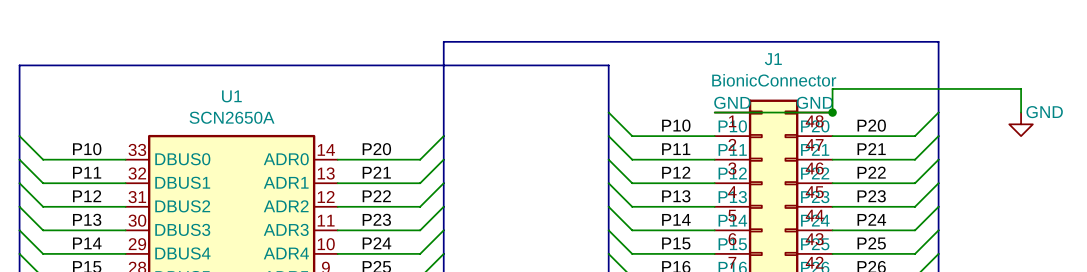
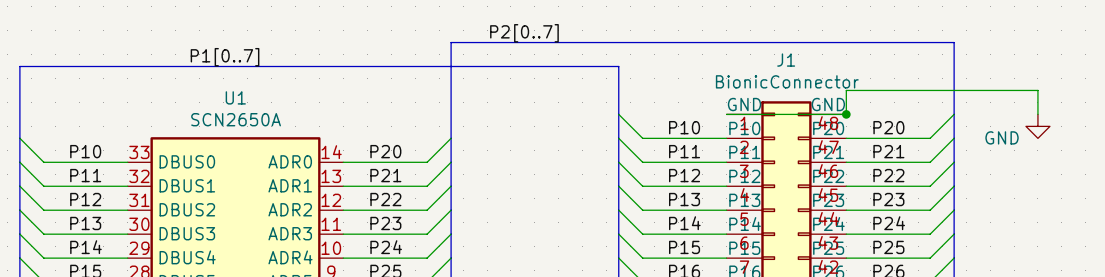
label: none -> P2[0..7] (524, 33)
label: none -> P1[0..7] (225, 57)
power symbol text position: GND (1044, 112) -> GND (1002, 137)

